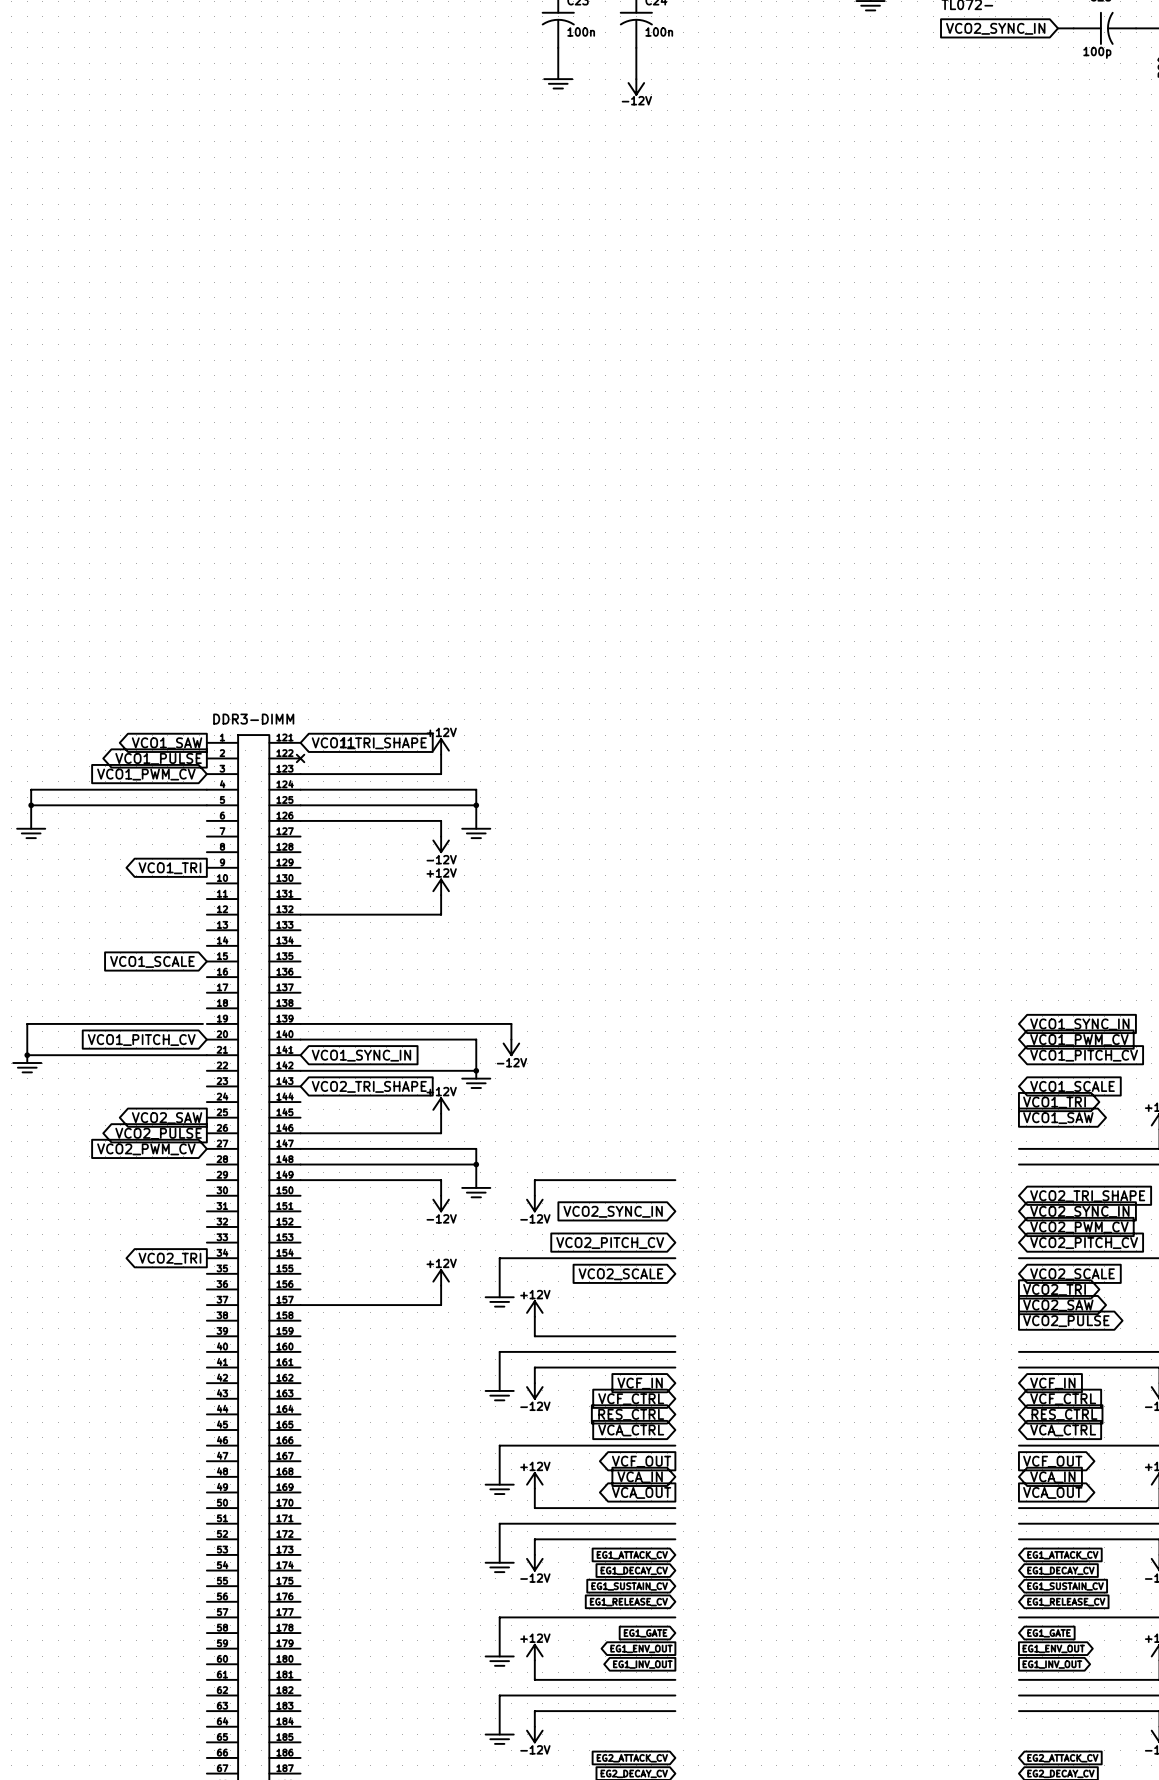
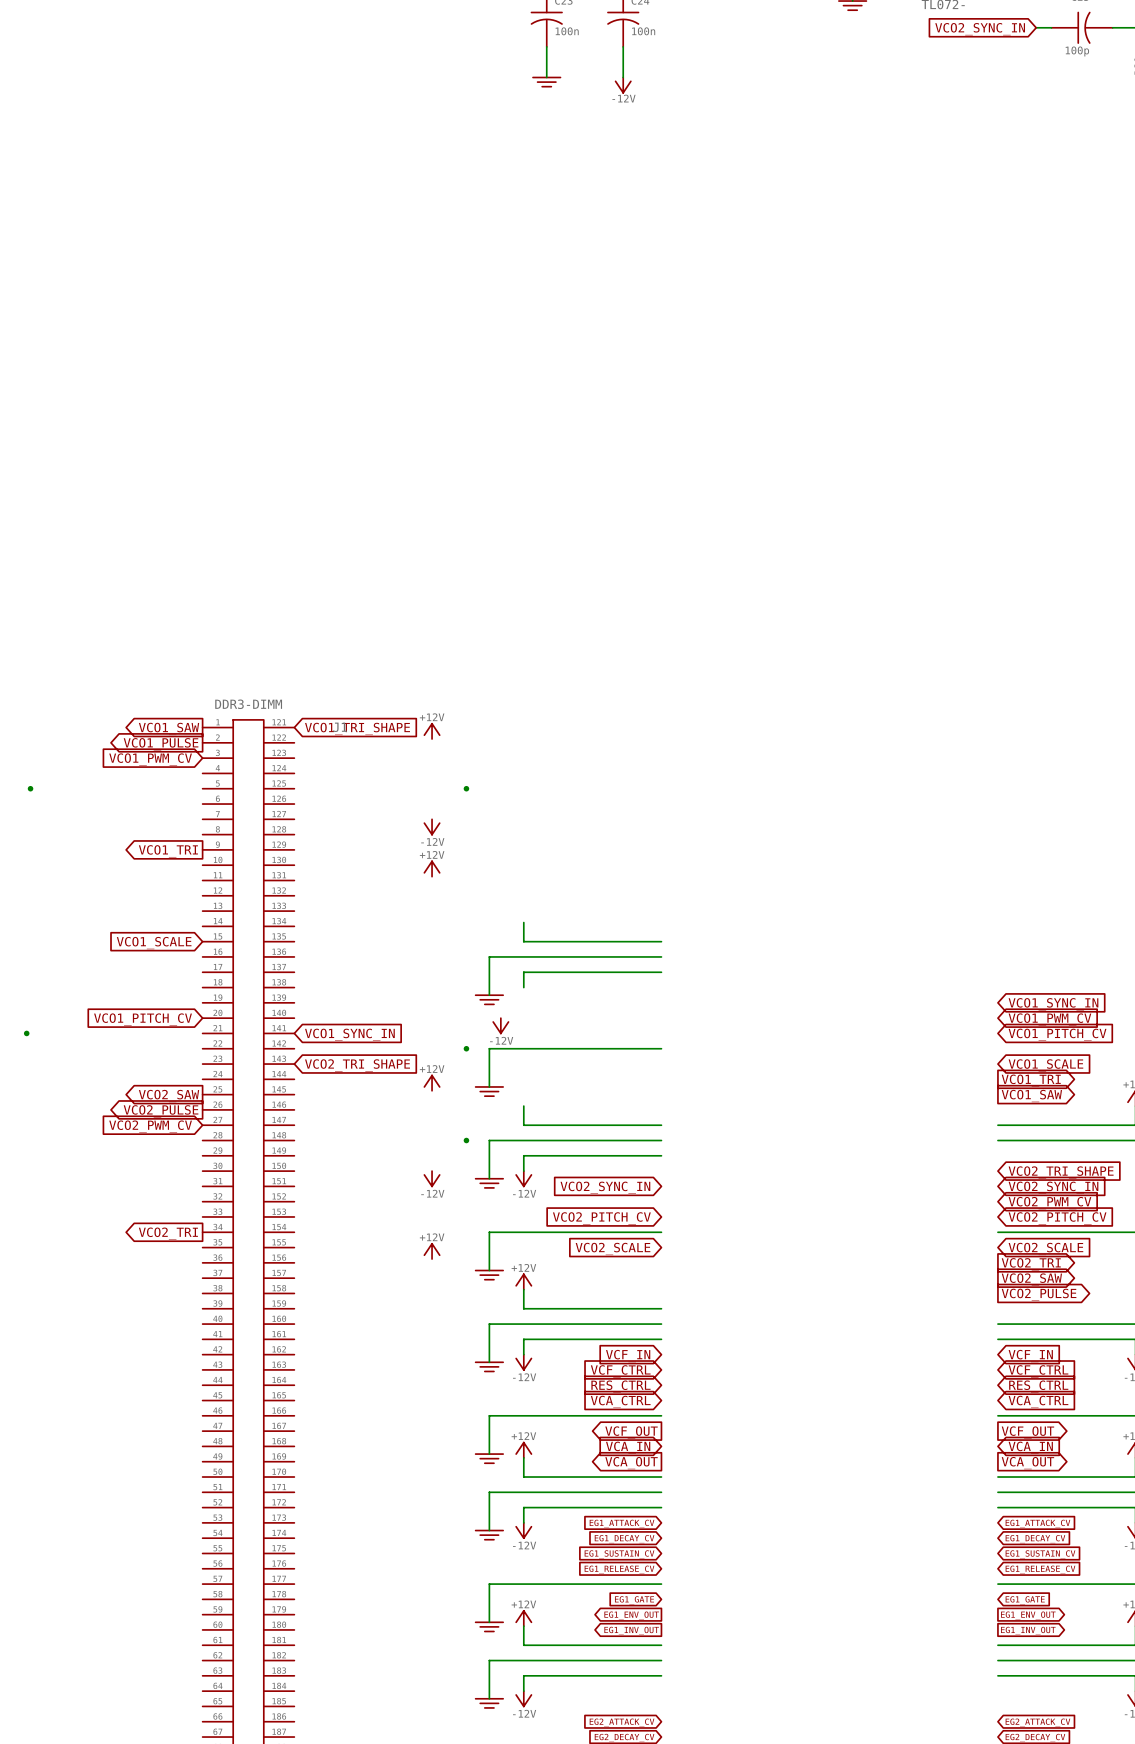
wire: (441, 754) (441, 774) (300, 774) -> none
no-connect mark: (300, 758) -> none
wire: (206, 789) (31, 789) (31, 828) -> none
wire: (300, 789) (476, 789) (476, 828) -> none
wire: (31, 805) (206, 805) -> none
wire: (300, 805) (476, 805) -> none
wire: (300, 820) (441, 820) (441, 836) -> none
power symbol: (31, 833) -> none
power symbol: (476, 833) -> none
wire: (441, 895) (441, 914) (300, 914) -> none
wire: none -> (523, 922) (523, 941) (661, 941)
wire: none -> (661, 956) (489, 956) (489, 995)
wire: none -> (661, 972) (523, 972) (523, 987)
power symbol: none -> (489, 999)
wire: (202, 1023) (27, 1023) (27, 1063) -> none
wire: (300, 1023) (511, 1023) (511, 1039) -> none
wire: (300, 1039) (476, 1039) (476, 1078) -> none
wire: (27, 1055) (206, 1055) -> none
power symbol: (27, 1067) -> none
wire: (300, 1070) (476, 1070) -> none
wire: none -> (661, 1048) (489, 1048) (489, 1086)
power symbol: (476, 1083) -> none
wire: (441, 1113) (441, 1133) (300, 1133) -> none
power symbol: none -> (489, 1091)
wire: none -> (523, 1106) (523, 1125) (661, 1125)
wire: (300, 1148) (476, 1148) (476, 1187) -> none
wire: (300, 1164) (476, 1164) -> none
wire: none -> (661, 1140) (489, 1140) (489, 1178)
wire: (300, 1180) (441, 1180) (441, 1195) -> none
power symbol position: (476, 1192) -> (489, 1183)
wire: (441, 1285) (441, 1305) (300, 1305) -> none

